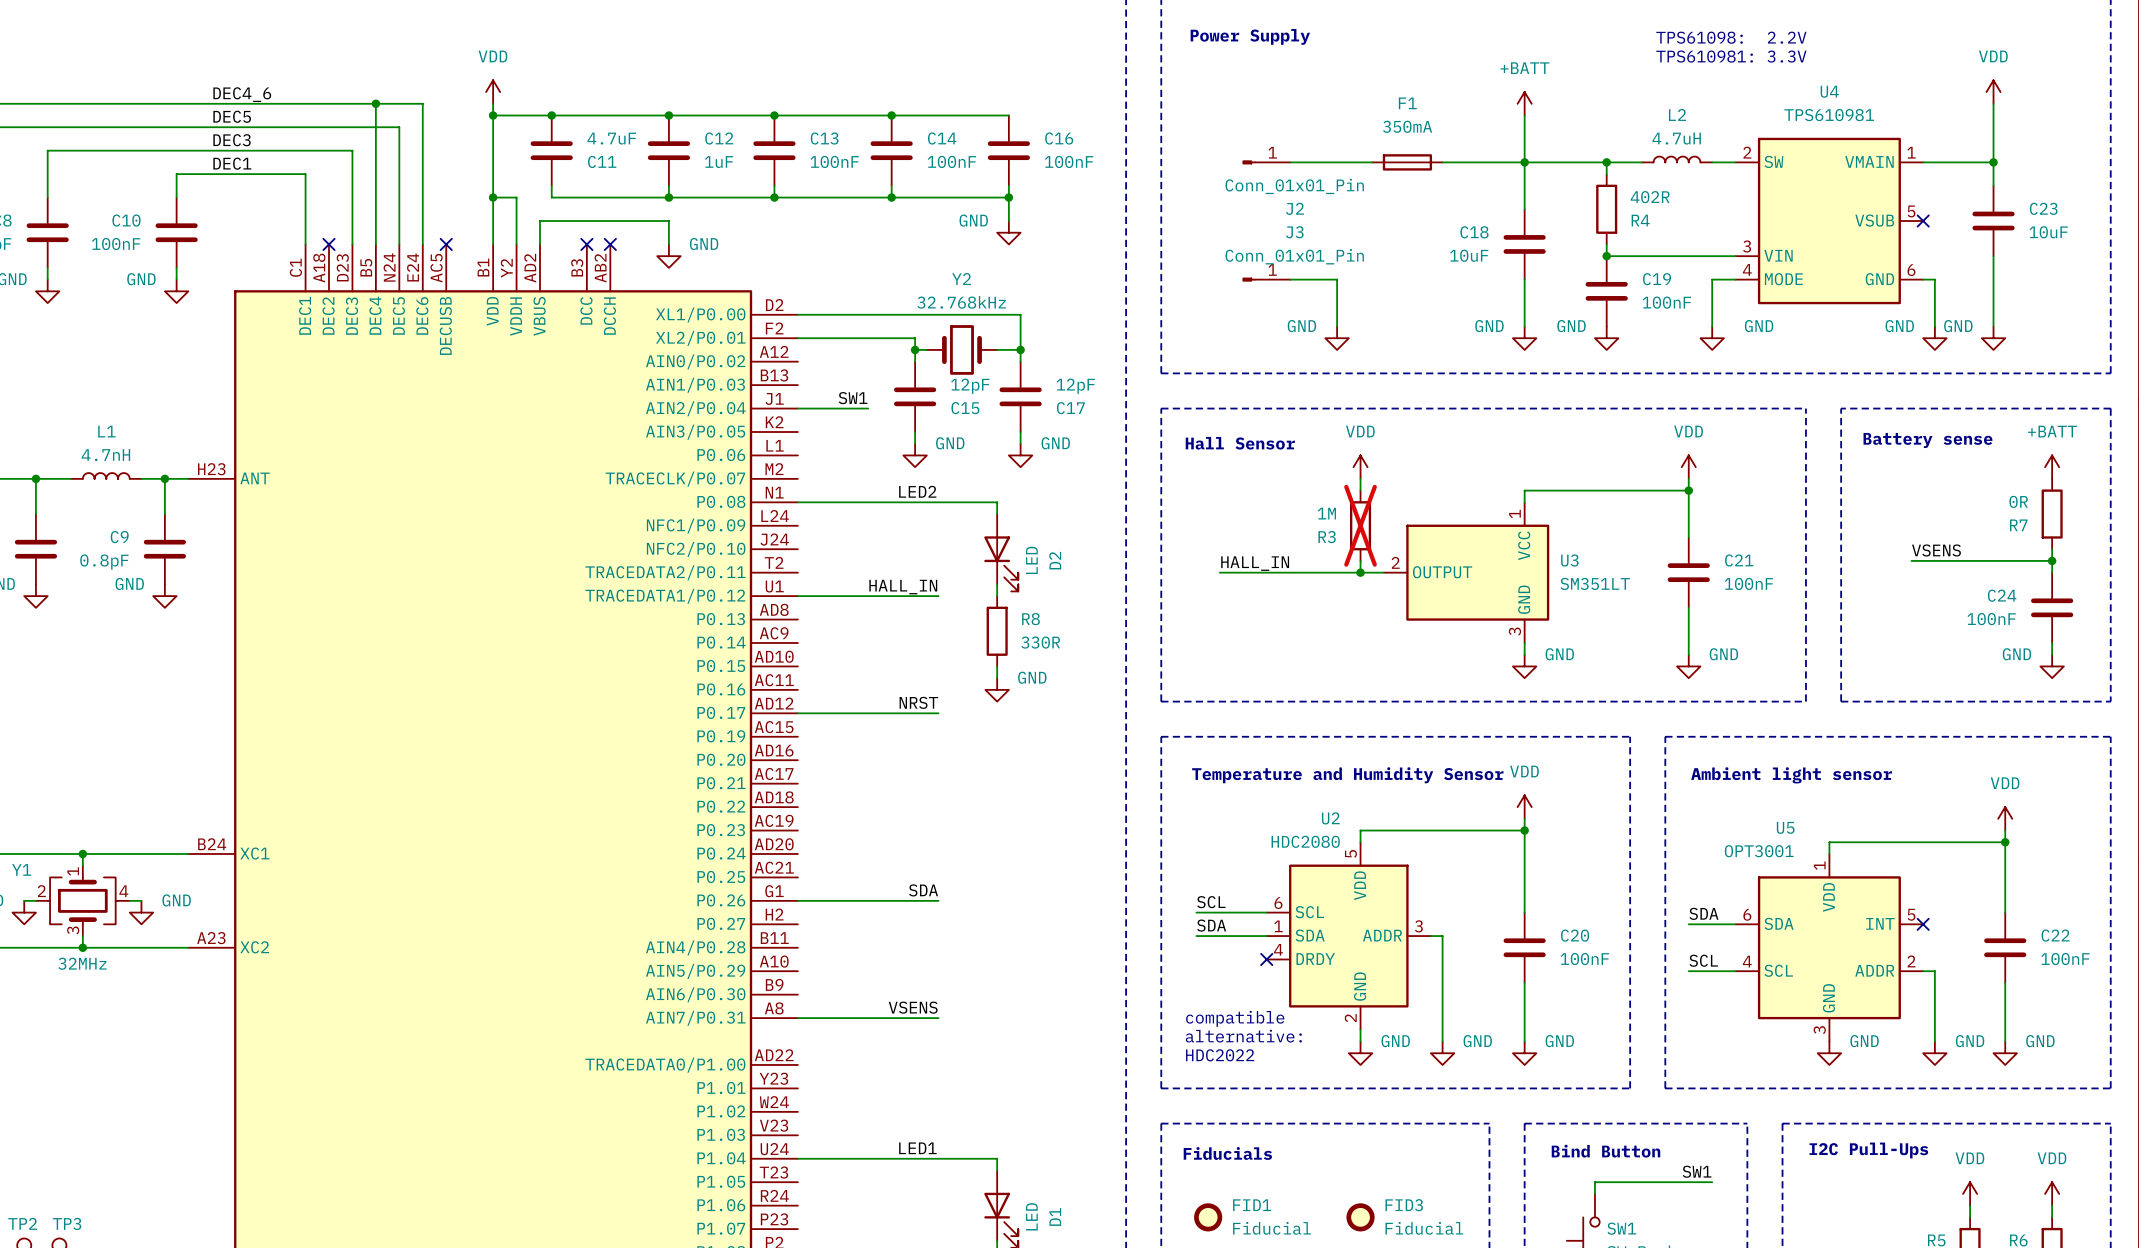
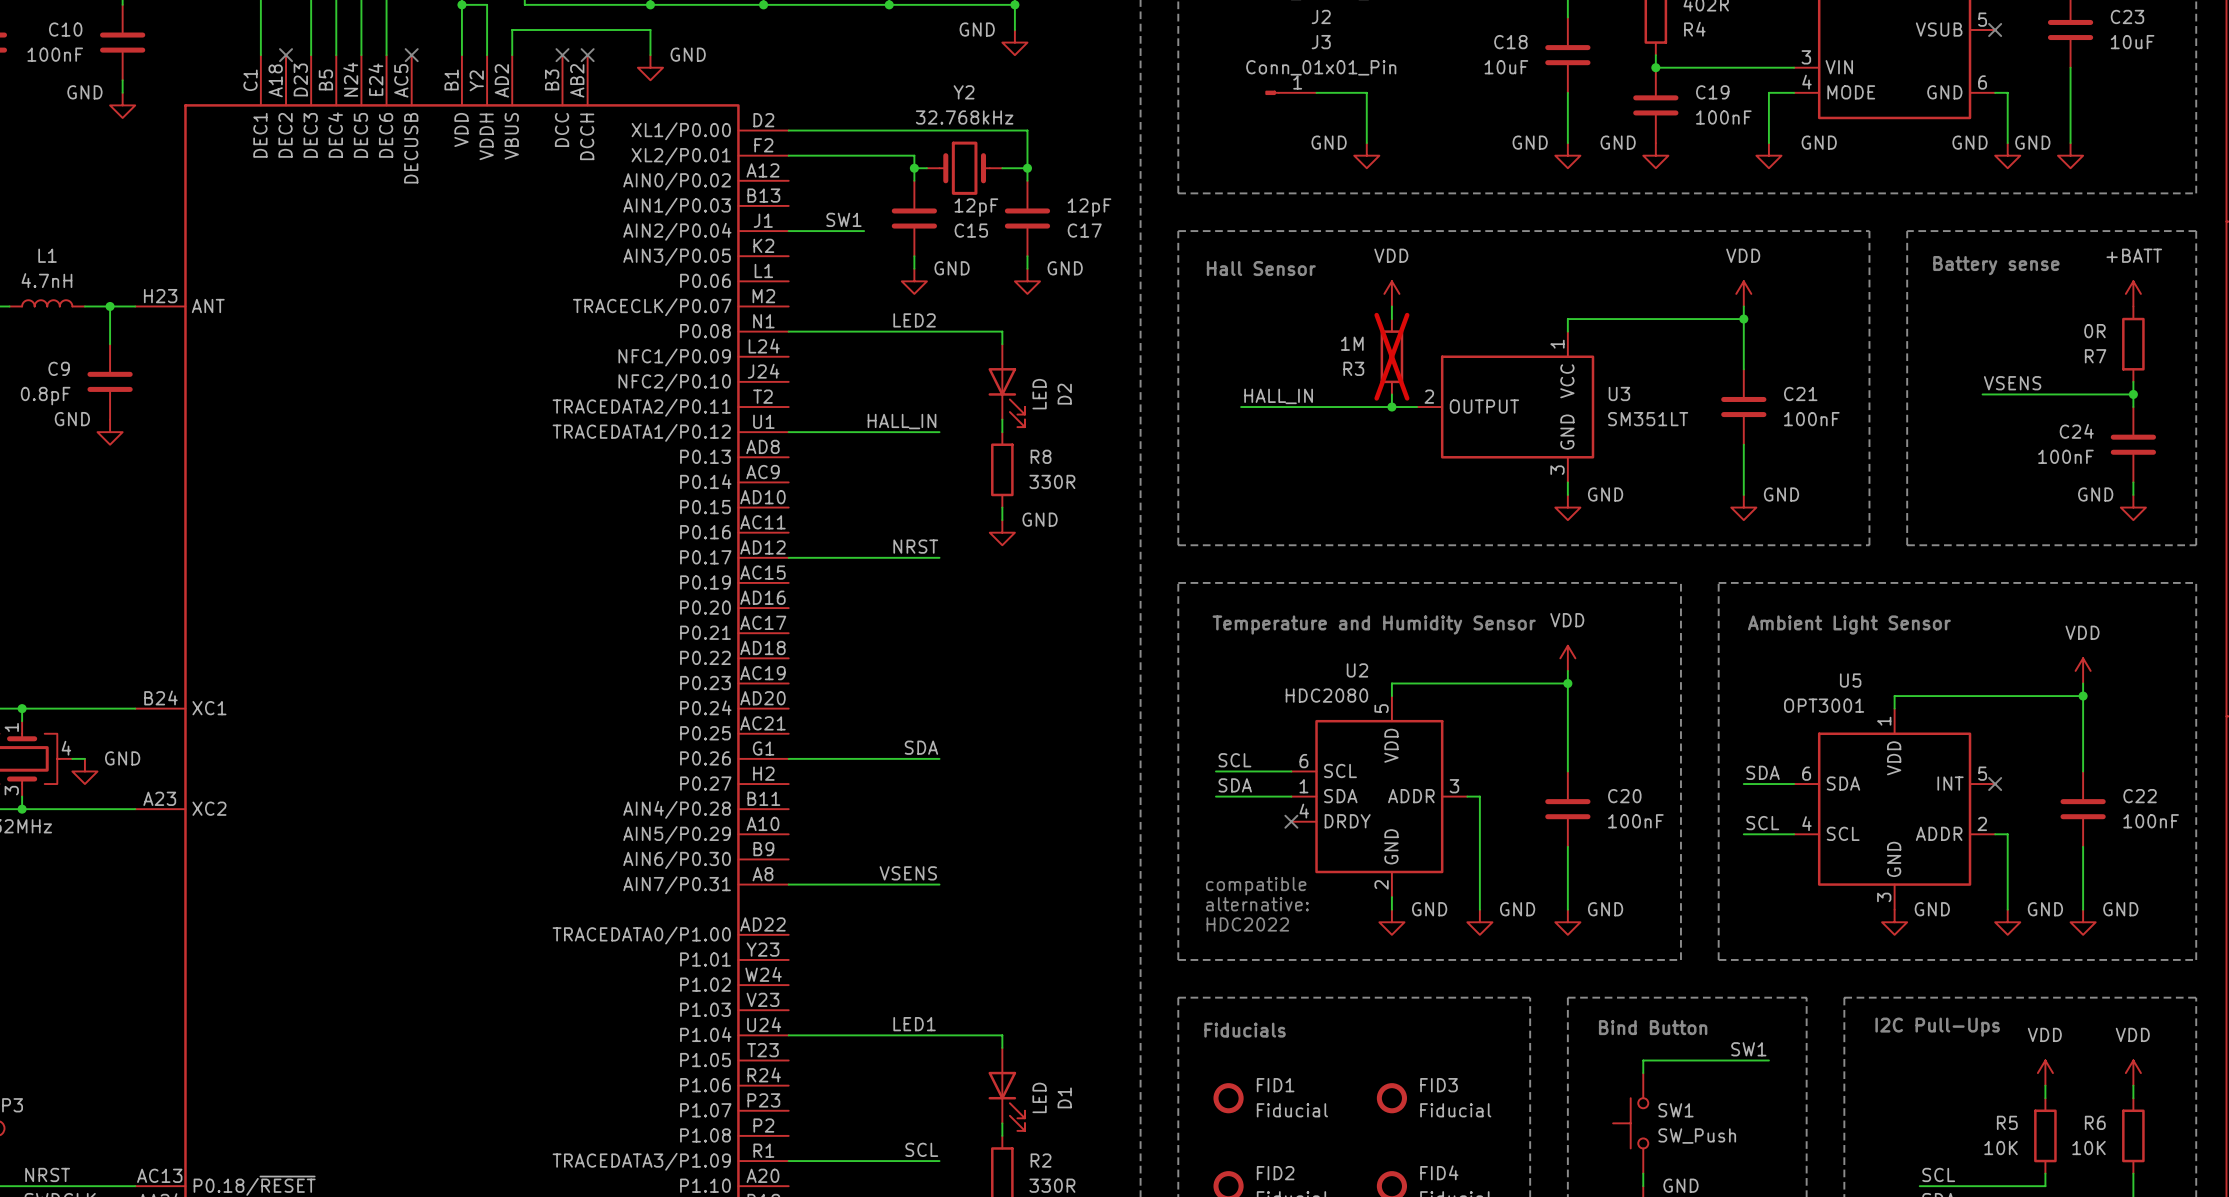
text: Ambient light sensor (1791, 775) -> Ambient Light Sensor (1849, 625)

